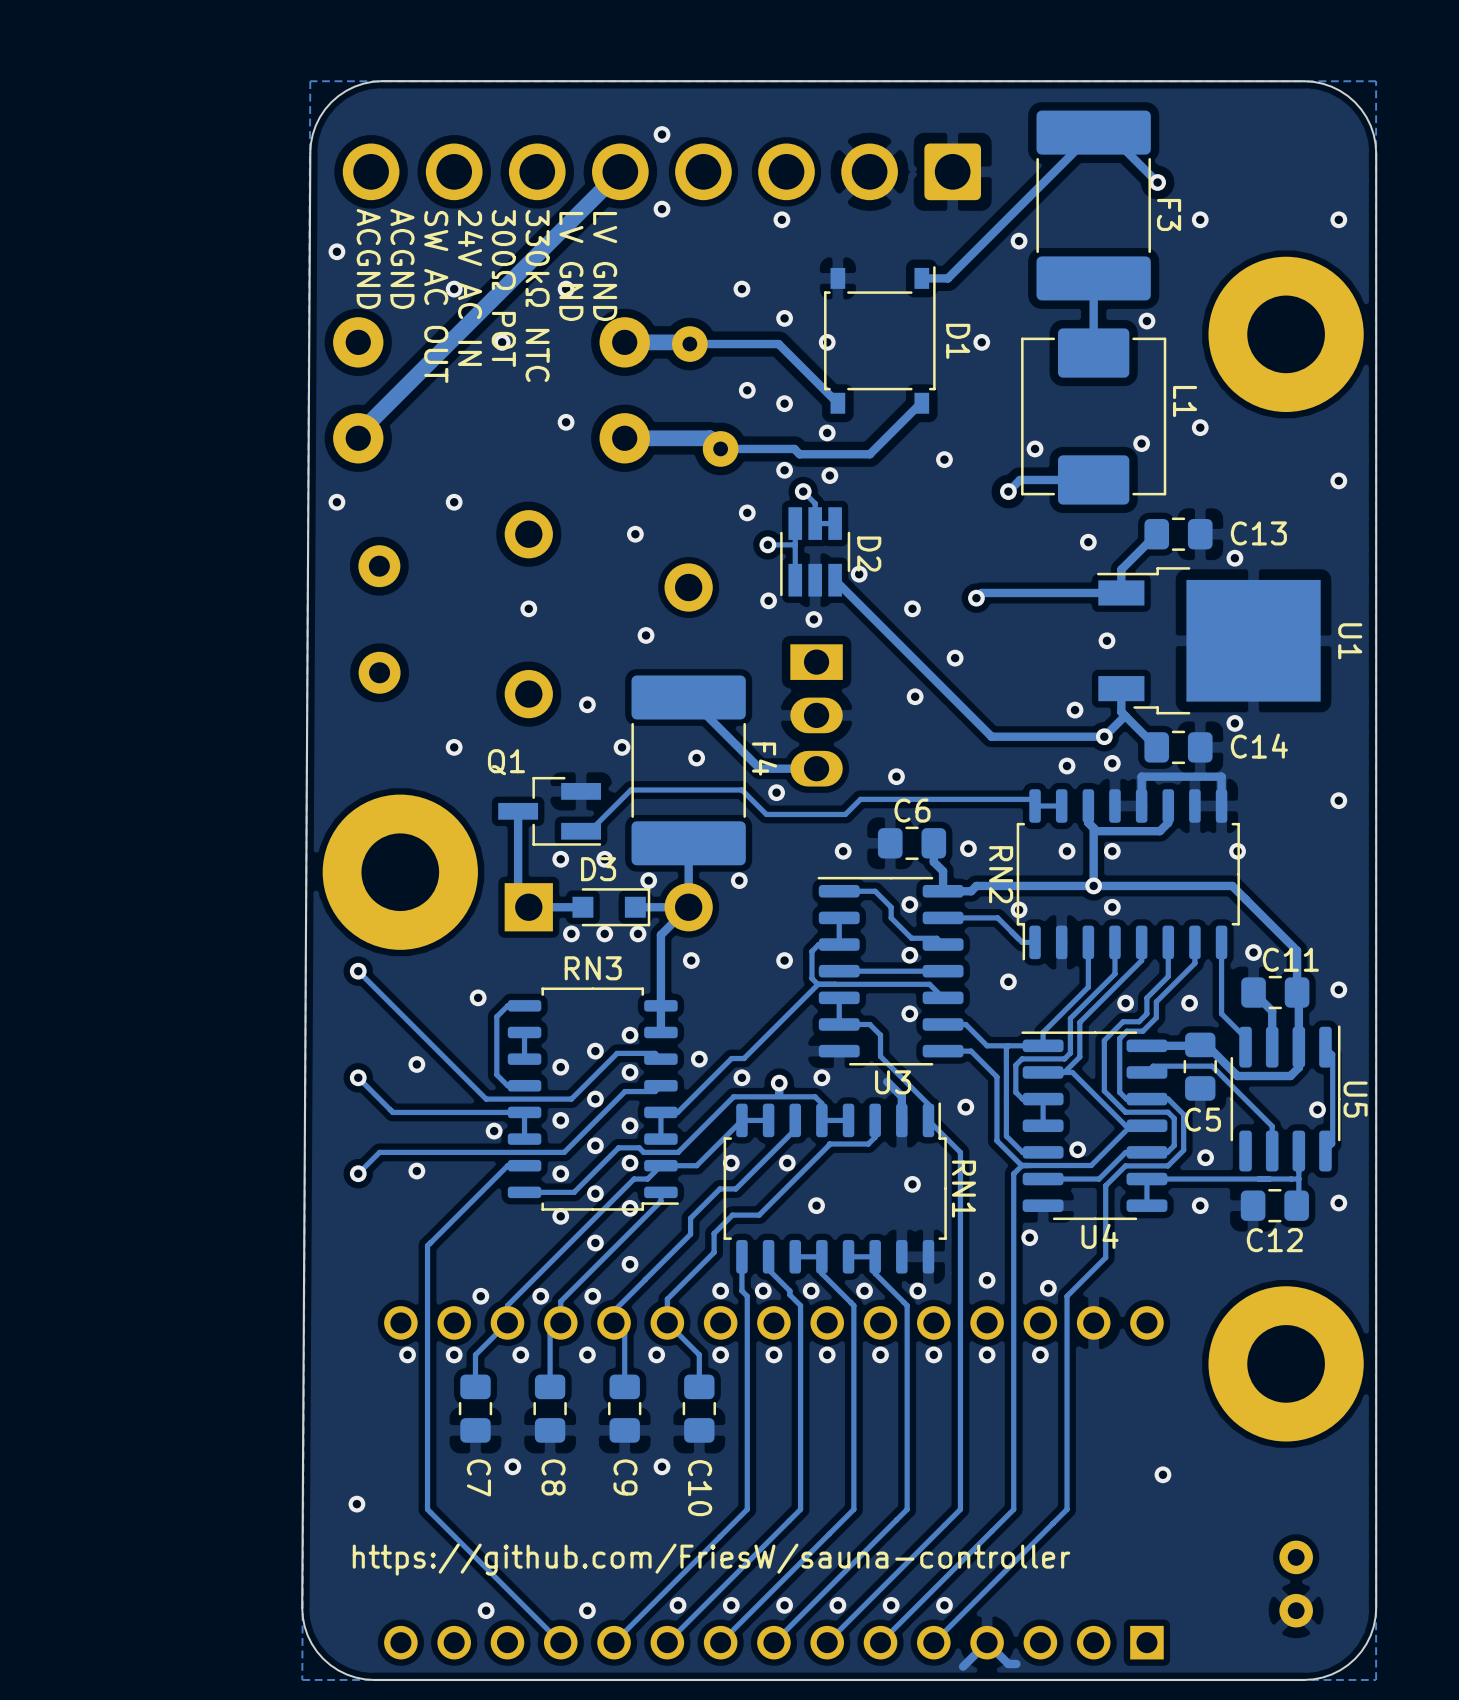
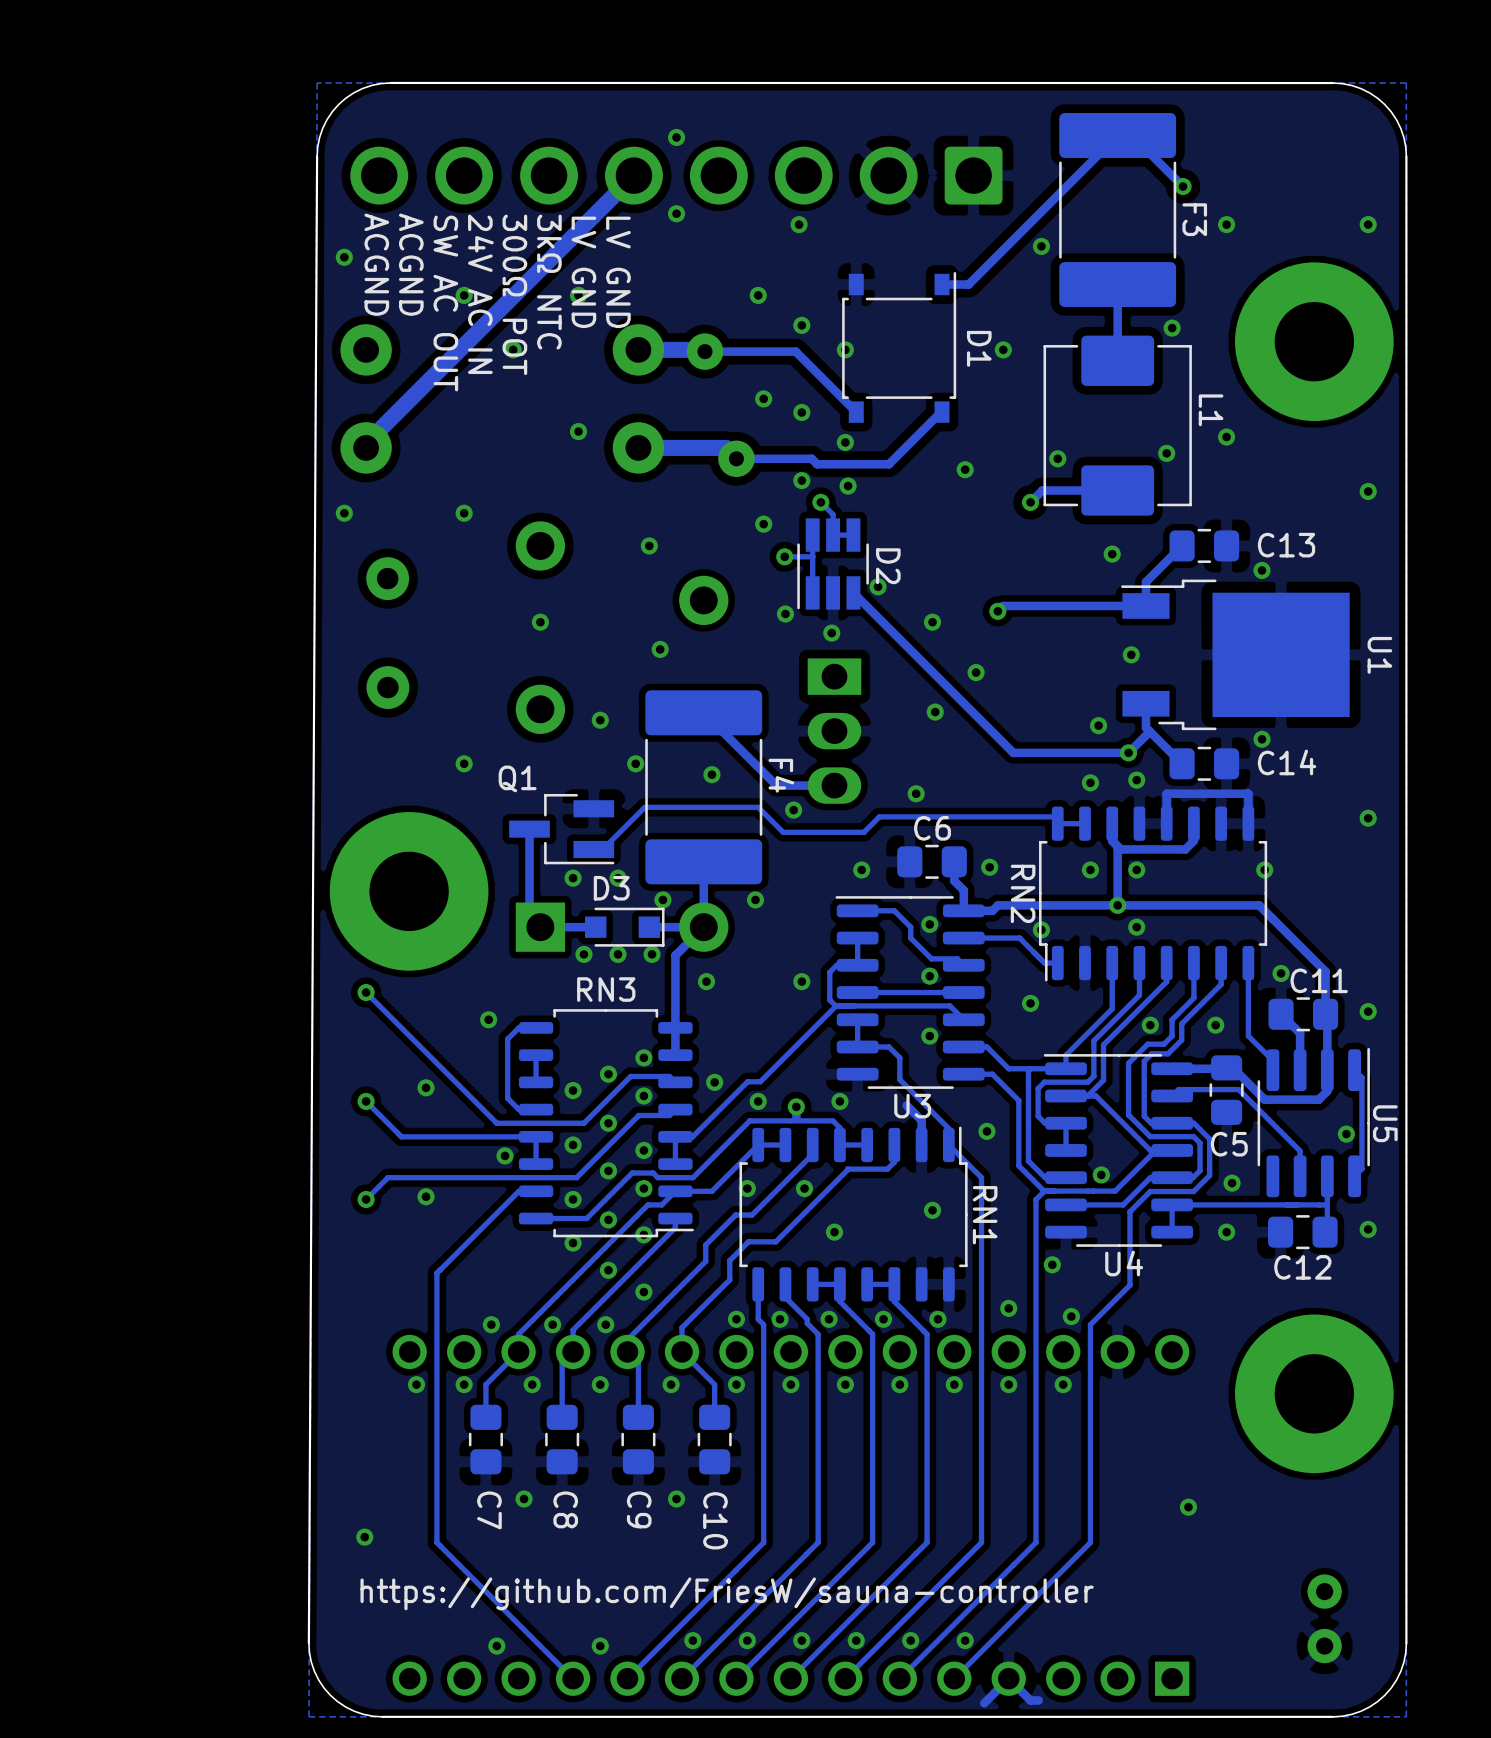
text: 330kΩ NTC (537, 295) -> 3kΩ NTC (549, 282)

